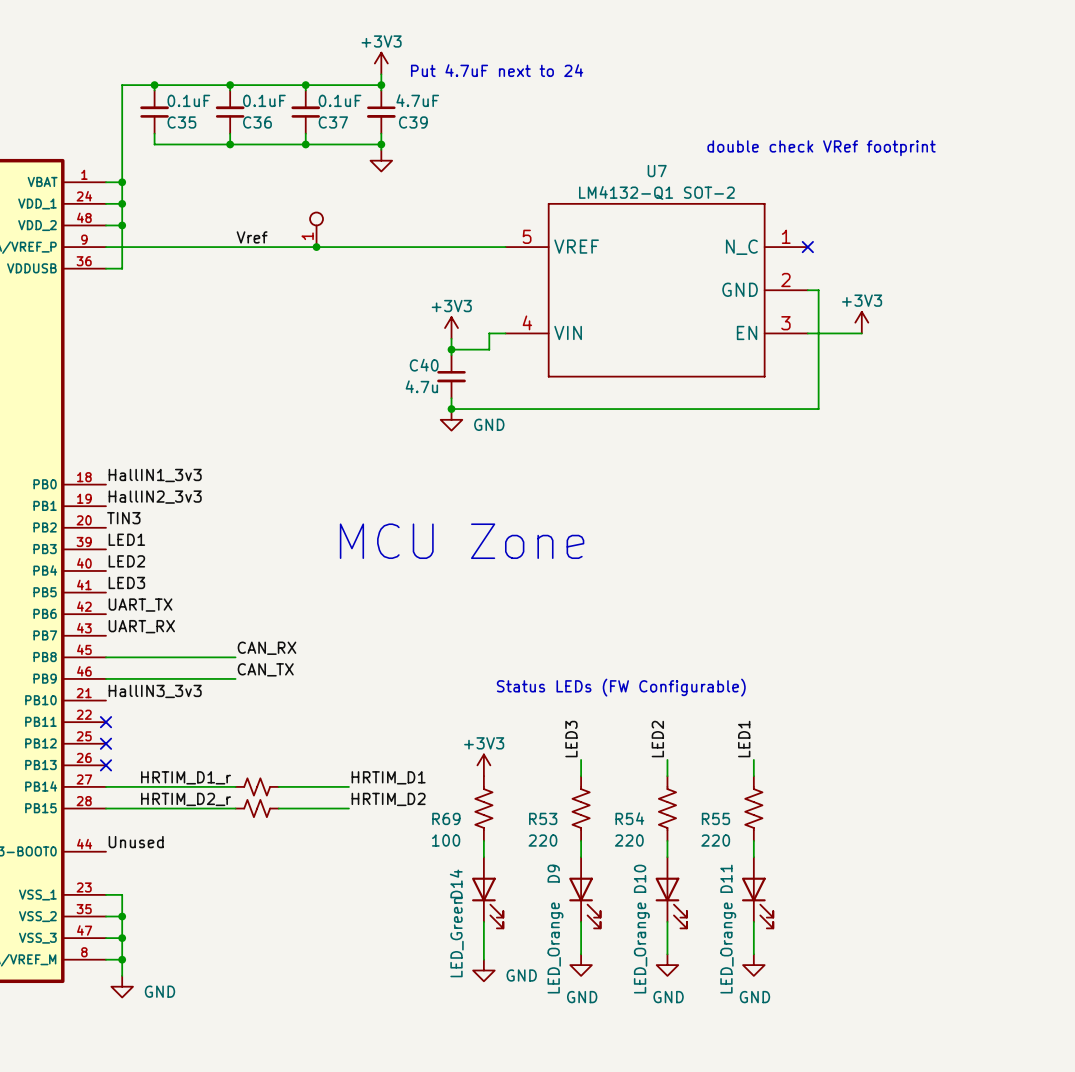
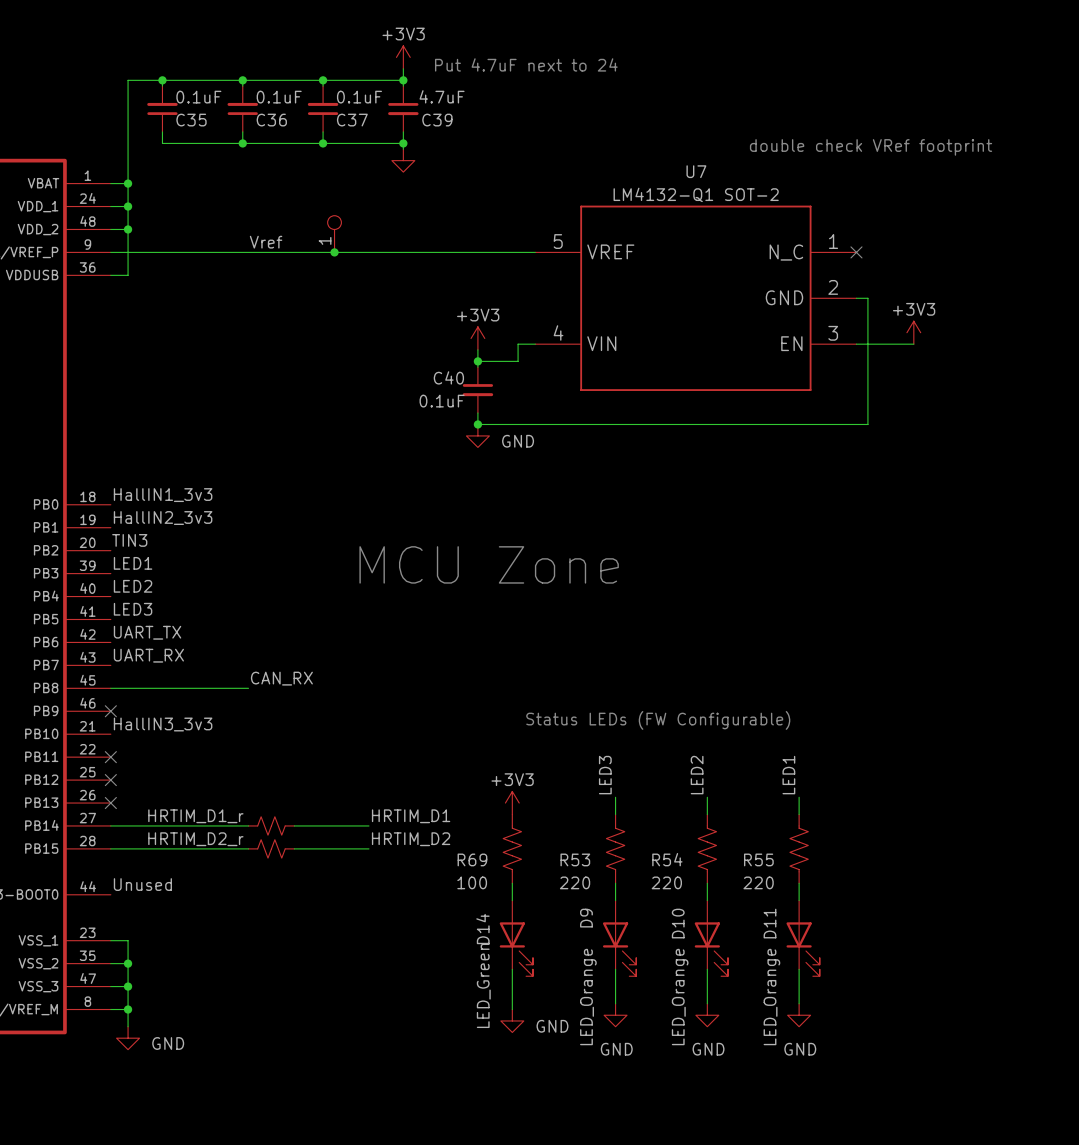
C40 value: 4.7u (421, 386) -> 0.1uF (442, 401)
label: CAN_TX (265, 669) -> none
wire: (105, 678) (235, 678) -> none
no-connect mark: none -> (110, 711)

